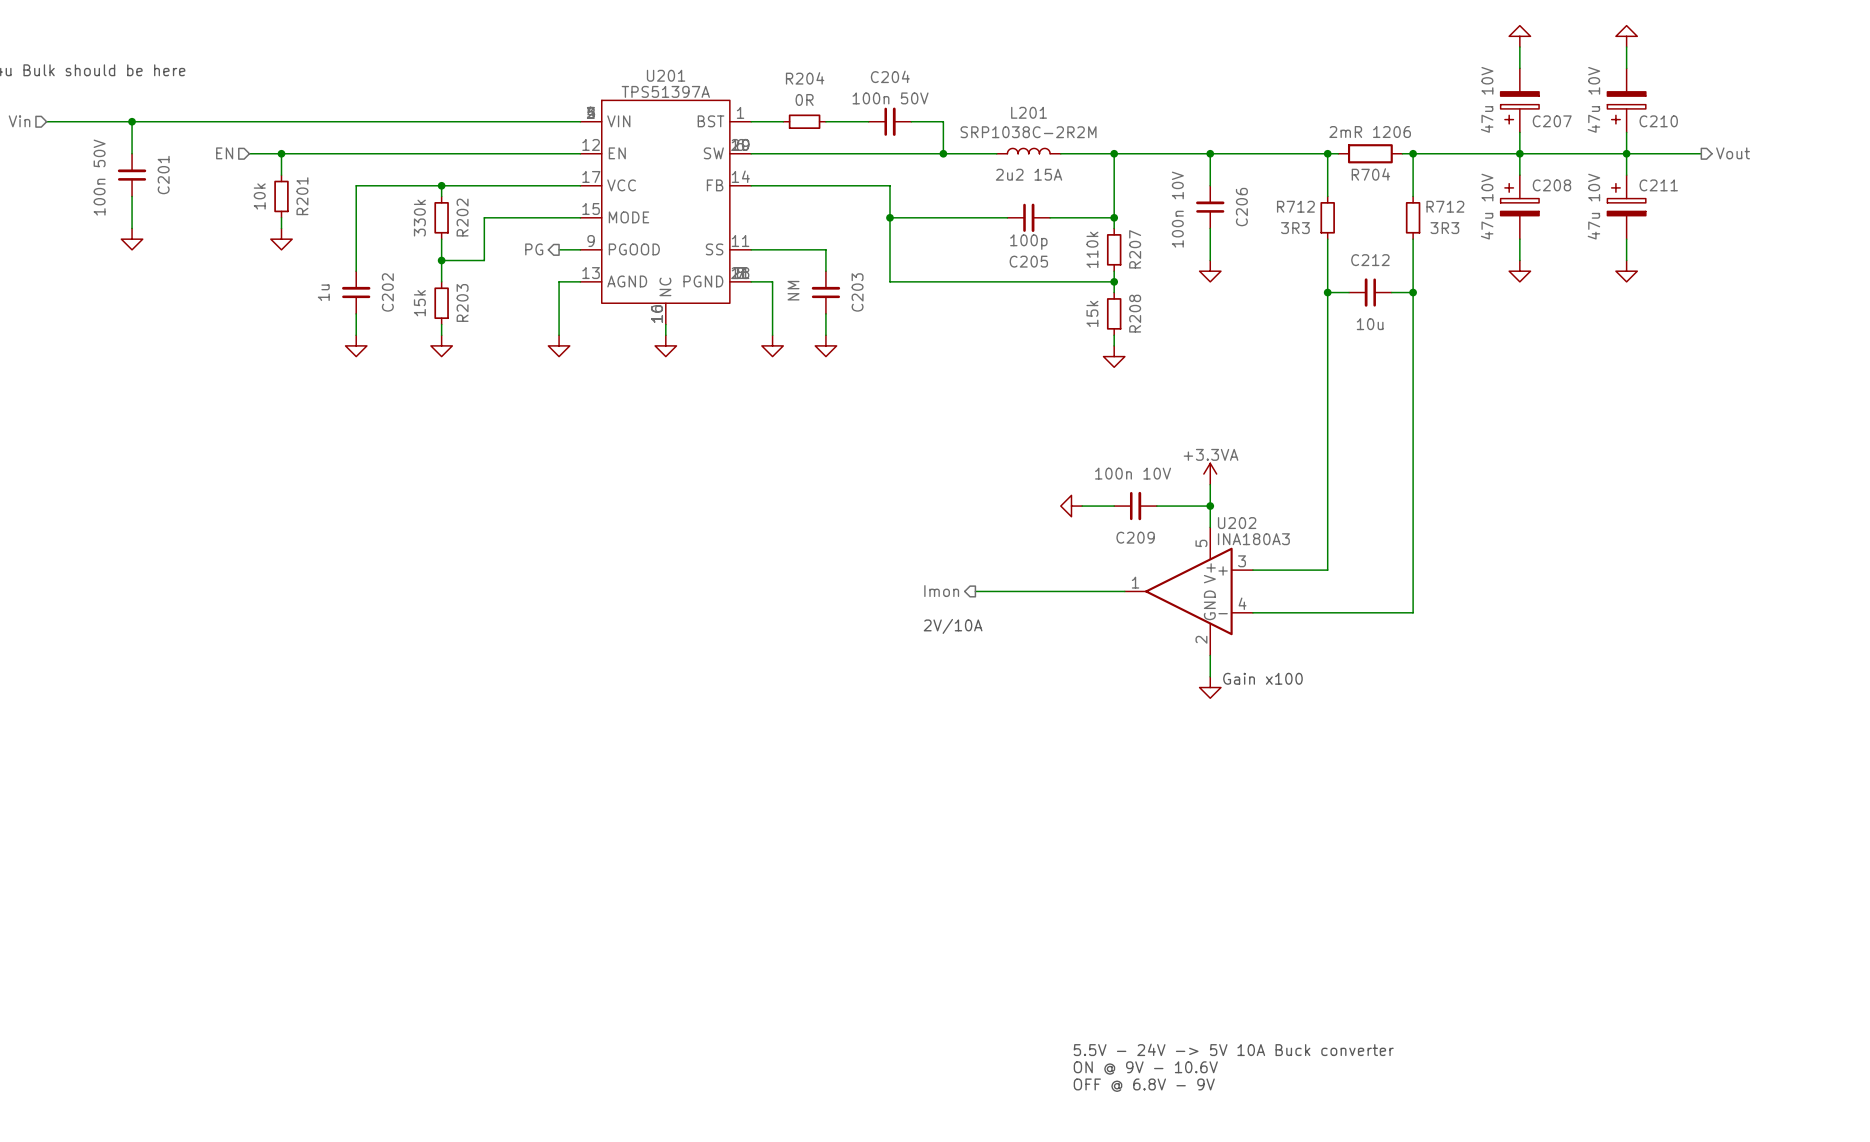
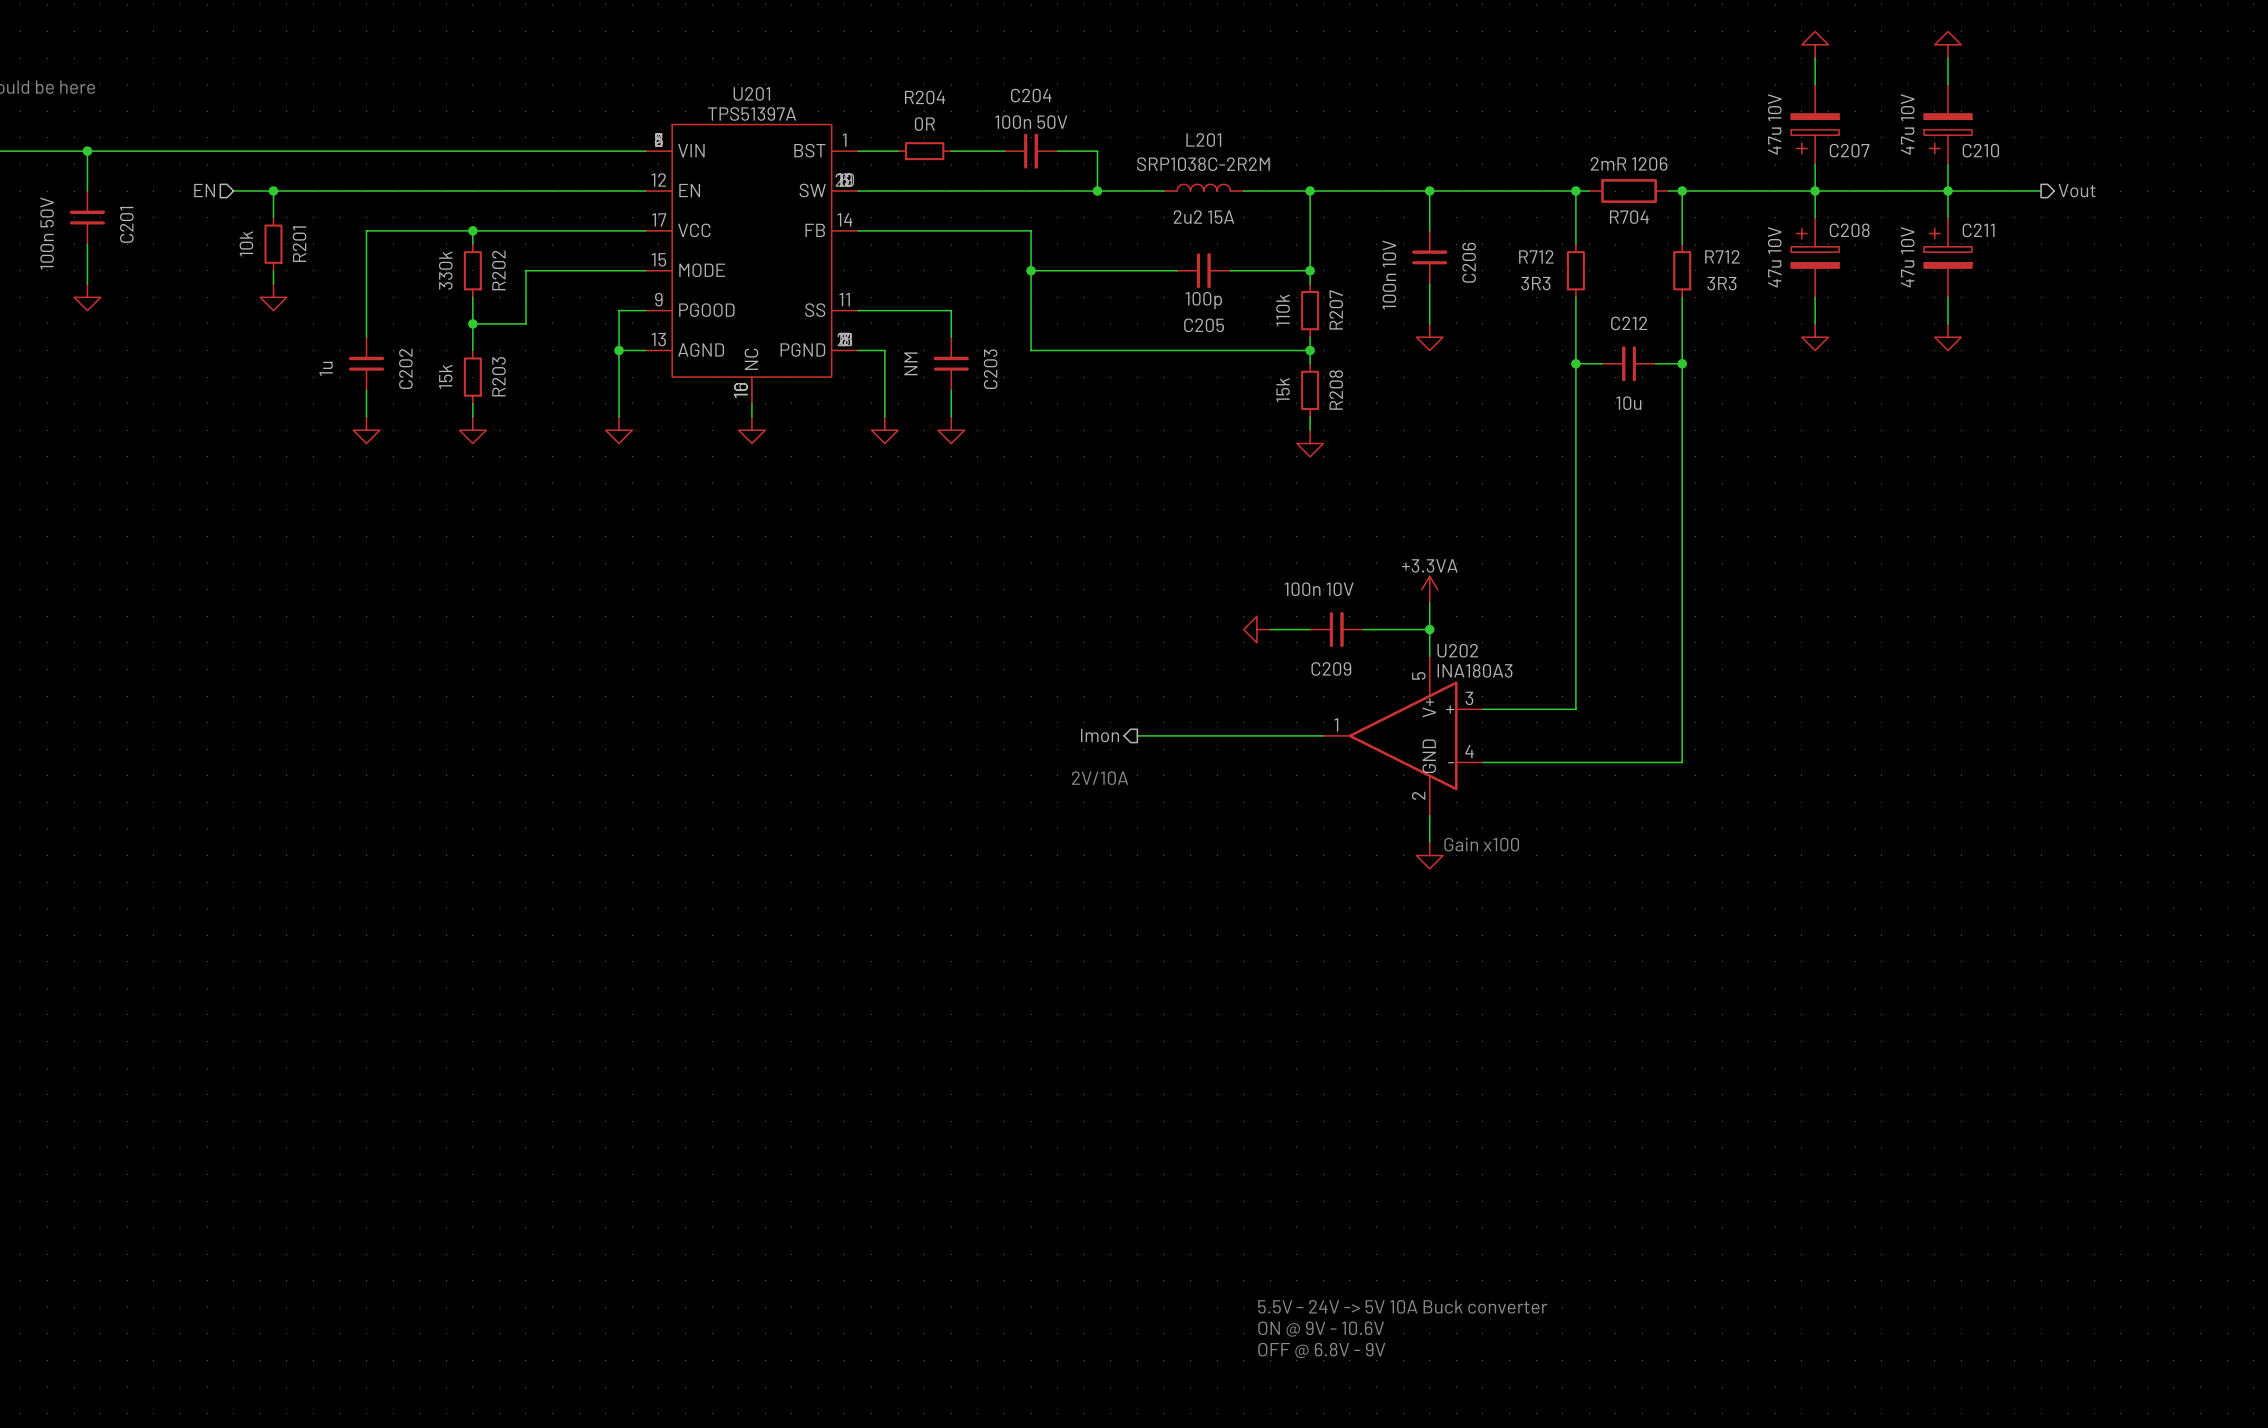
hierarchical label: PG (534, 249) -> none
wire: none -> (619, 310) (619, 350)
junction: none -> (619, 350)

